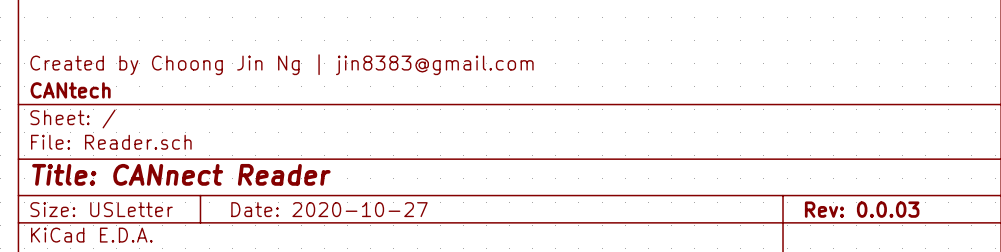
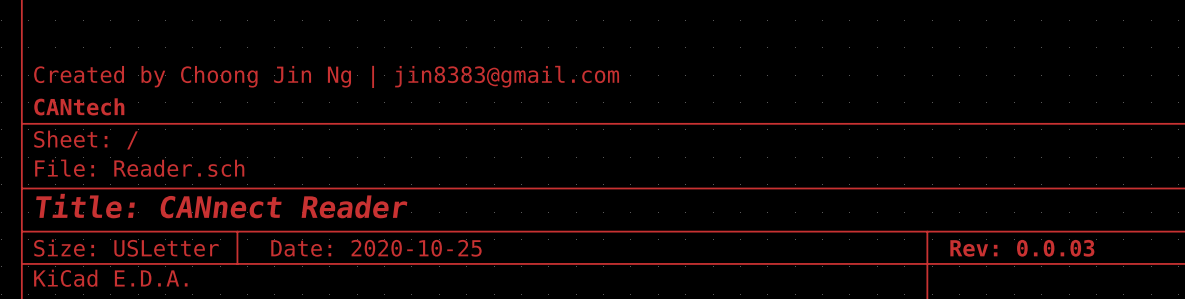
title block: Date: 2020-10-27 (329, 209) -> Date: 2020-10-25 (376, 248)

